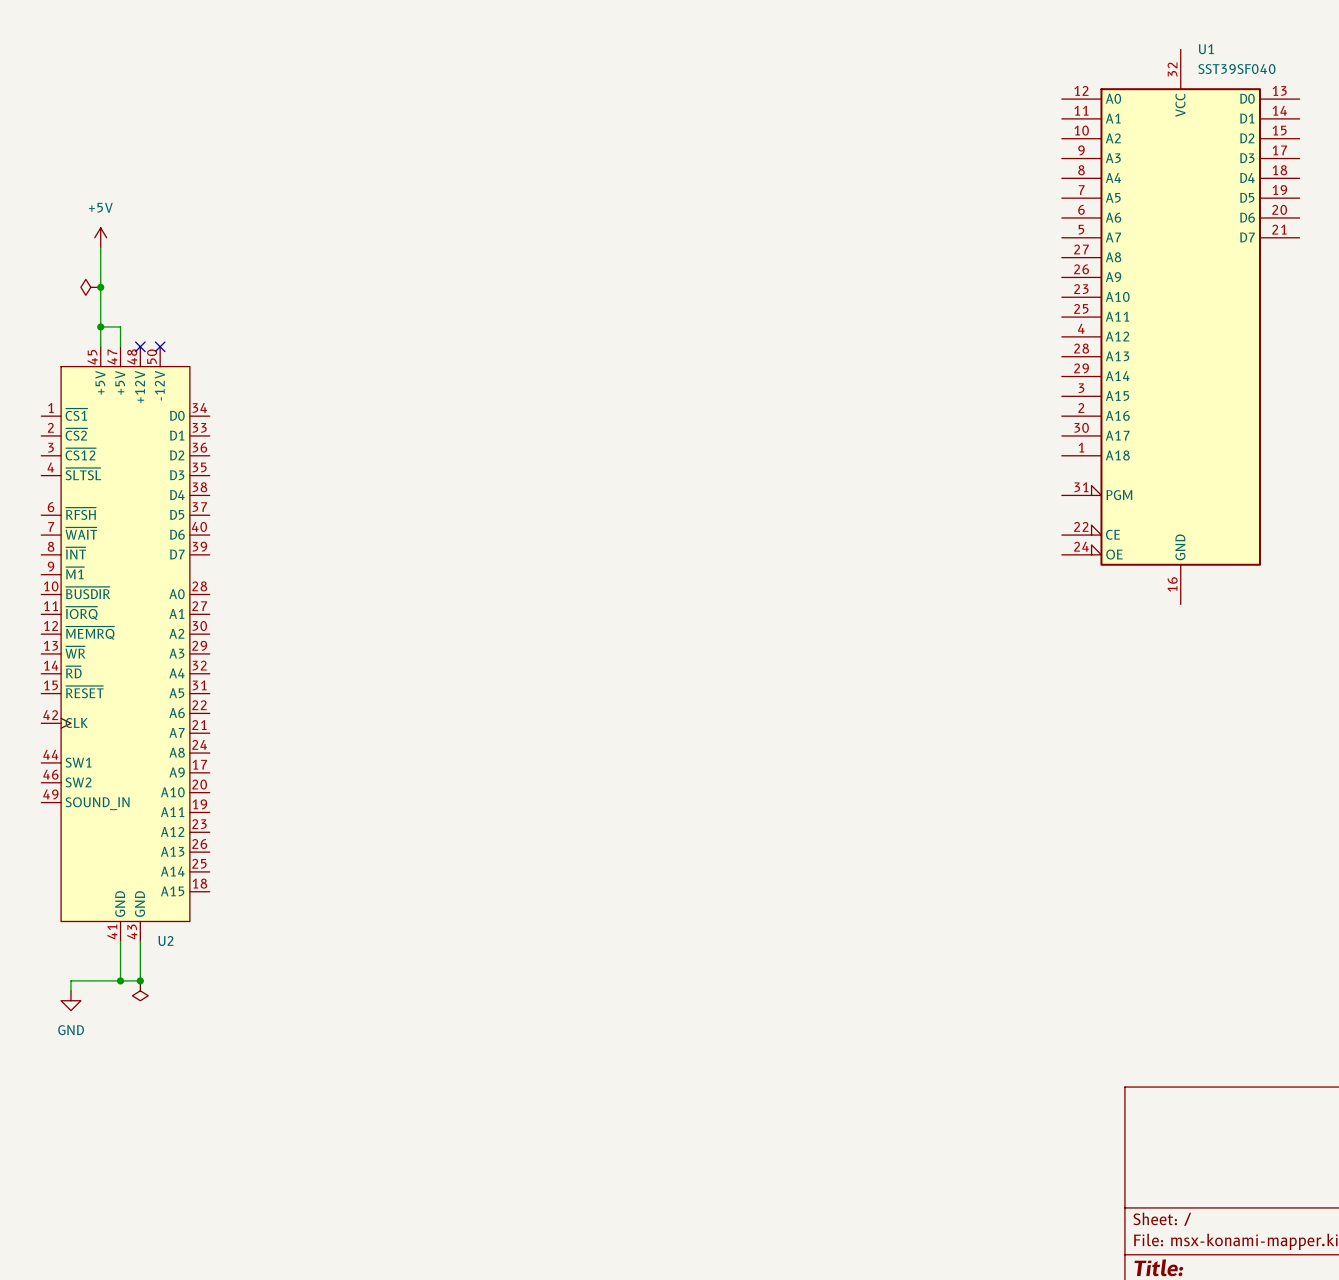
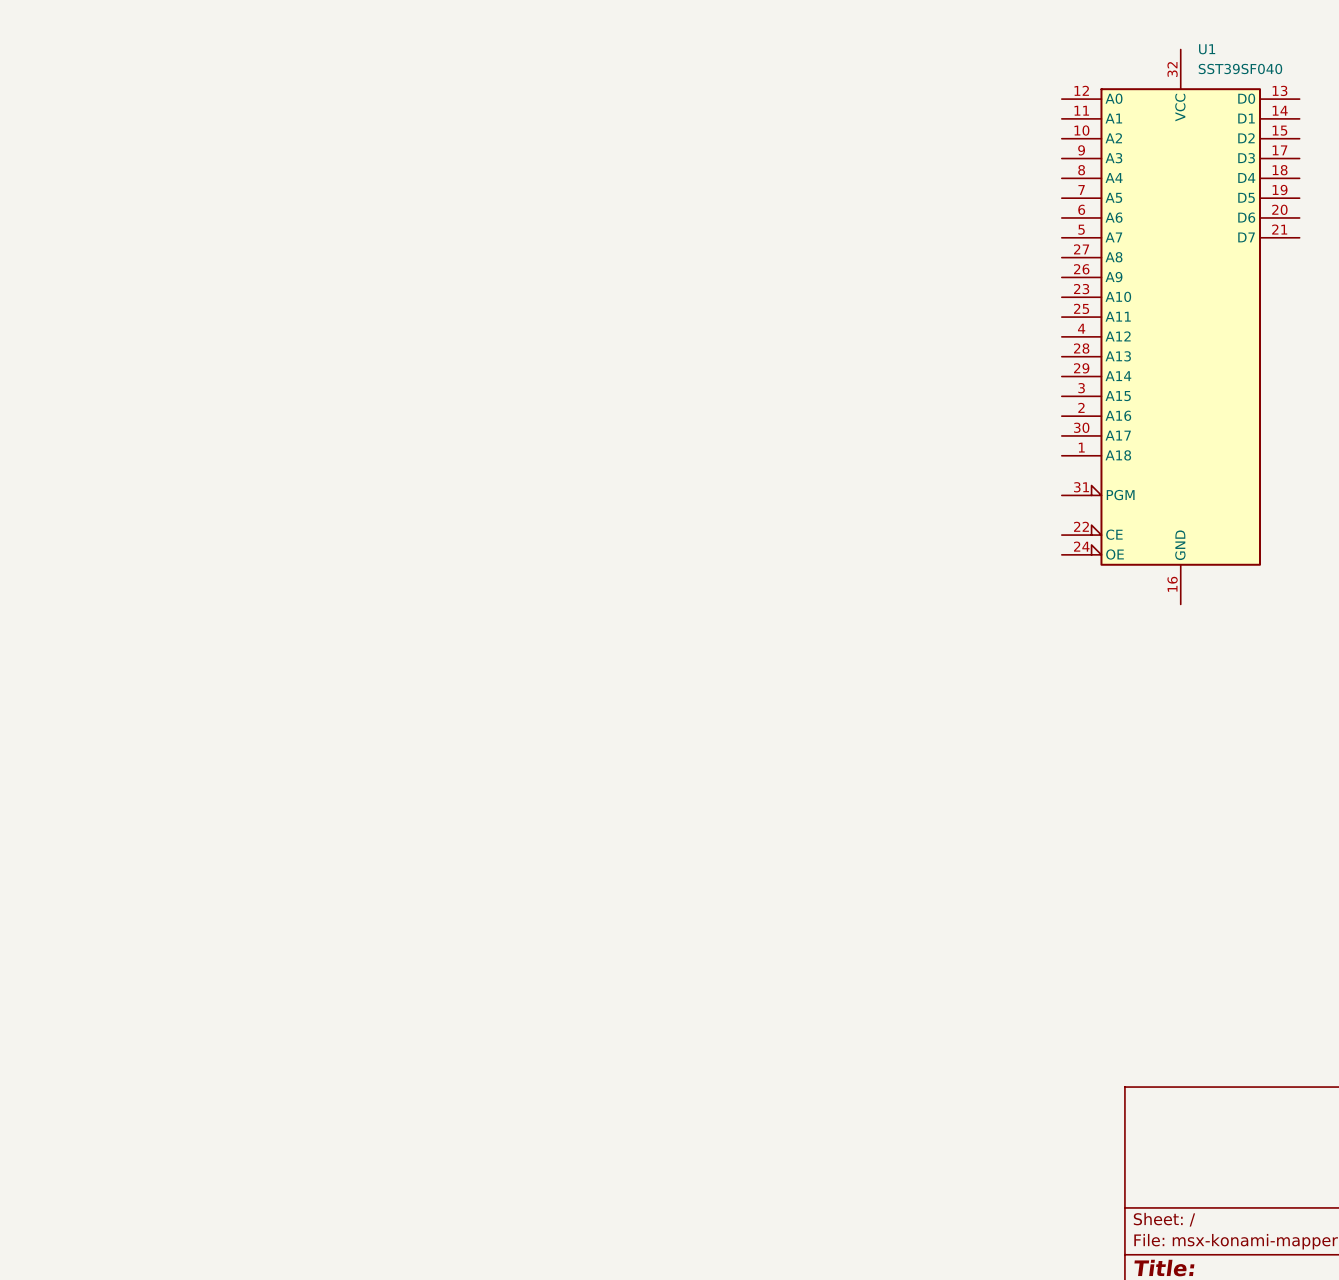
power symbol: +5V (100, 237) -> none
wire: (100, 247) (100, 346) -> none
power symbol: (90, 287) -> none
junction: (100, 287) -> none
wire: (100, 326) (120, 326) (120, 346) -> none
junction: (100, 326) -> none
no-connect mark: (140, 346) -> none
no-connect mark: (160, 346) -> none
U2: (125, 644) -> none
wire: (120, 941) (120, 980) -> none
wire: (140, 941) (140, 980) (70, 980) (70, 990) -> none
junction: (120, 980) -> none
junction: (140, 980) -> none
power symbol: (140, 990) -> none
power symbol: GND (70, 1000) -> none

